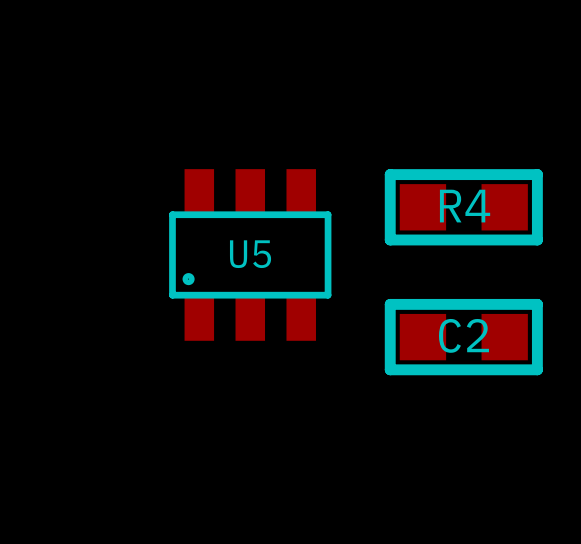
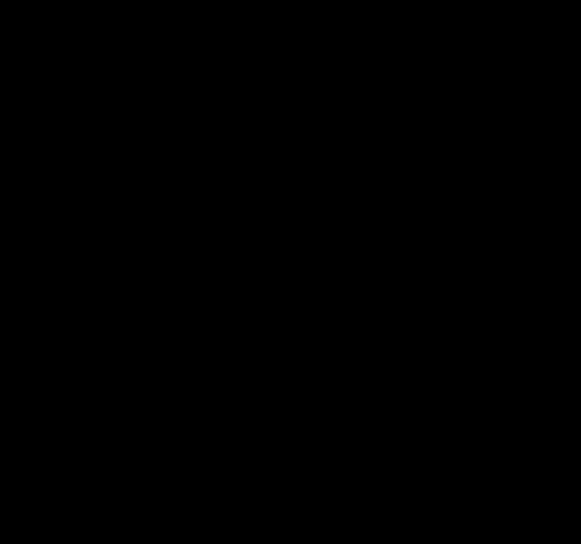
R4: (463, 207) -> none
U5: (250, 254) -> none
C2: (463, 337) -> none

